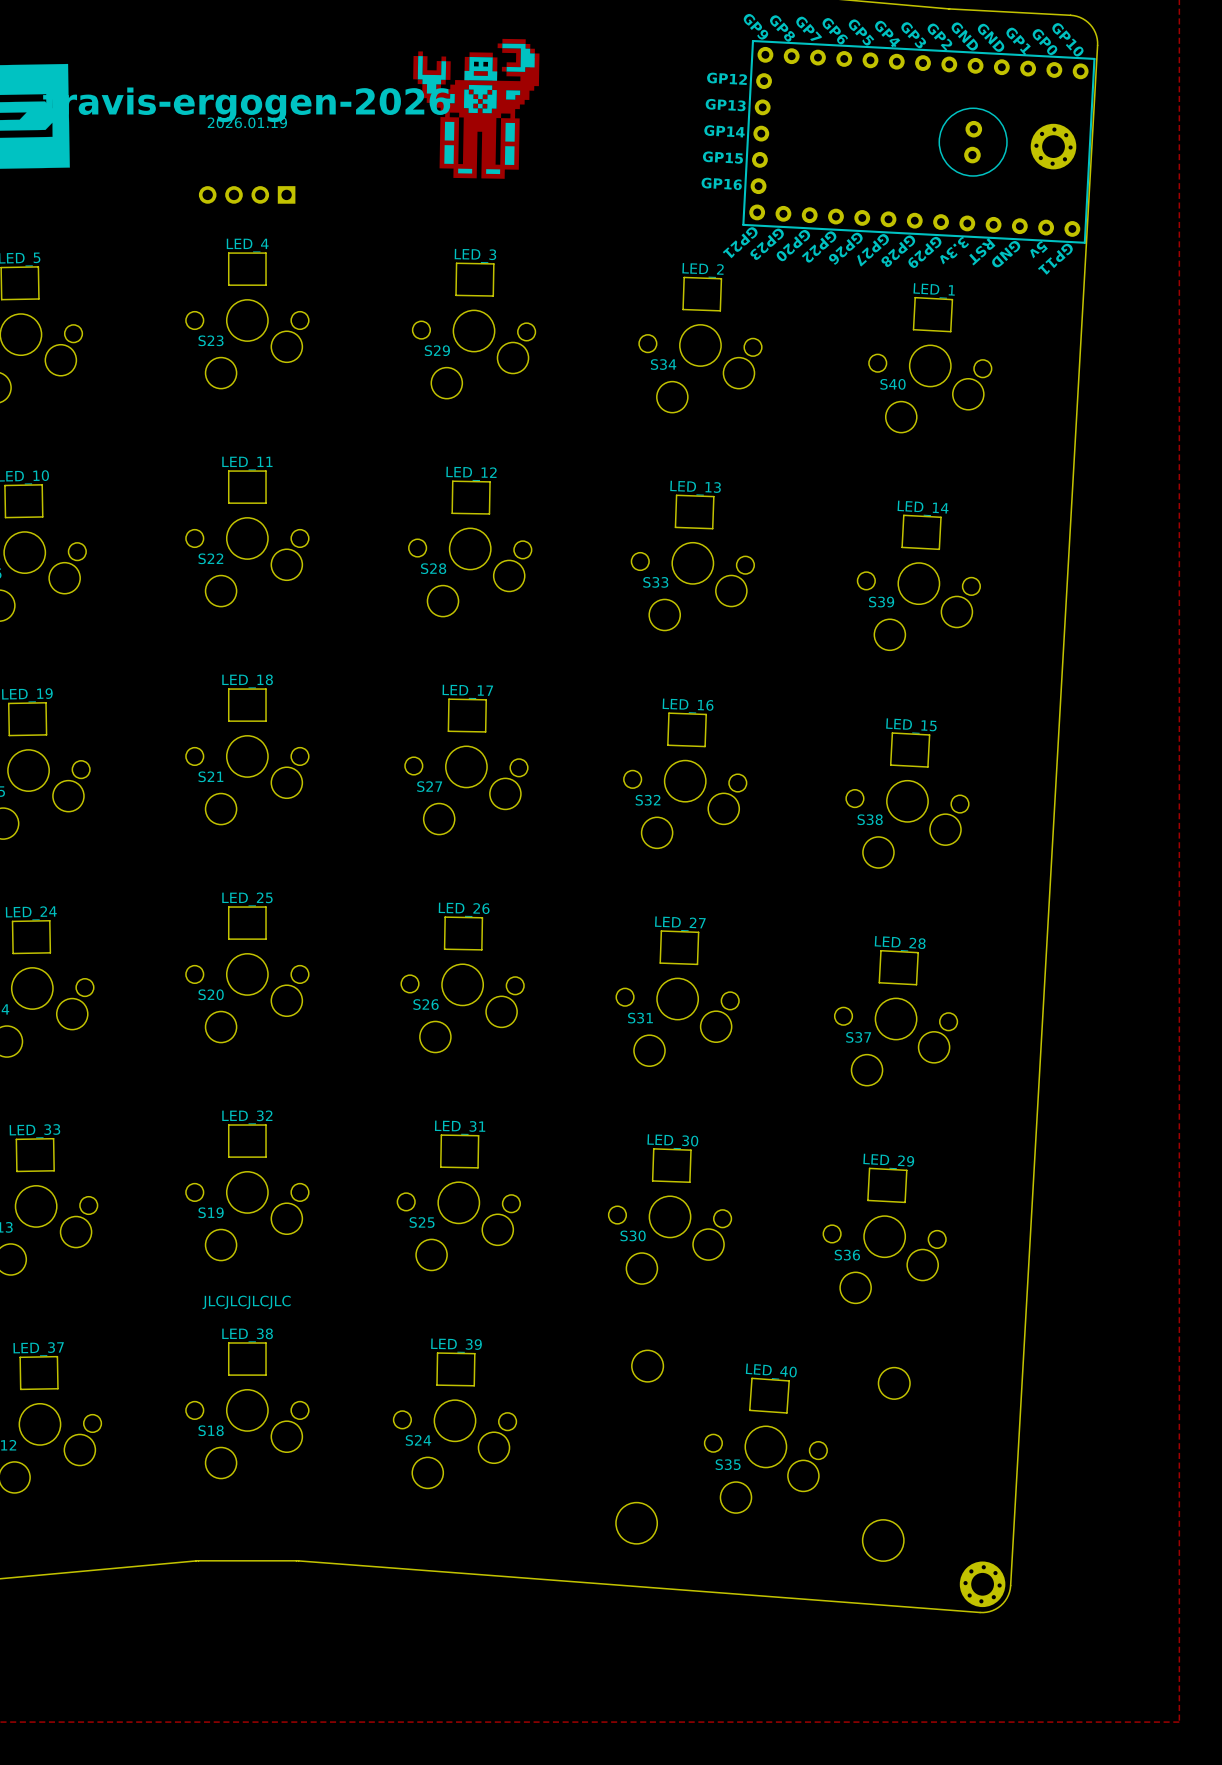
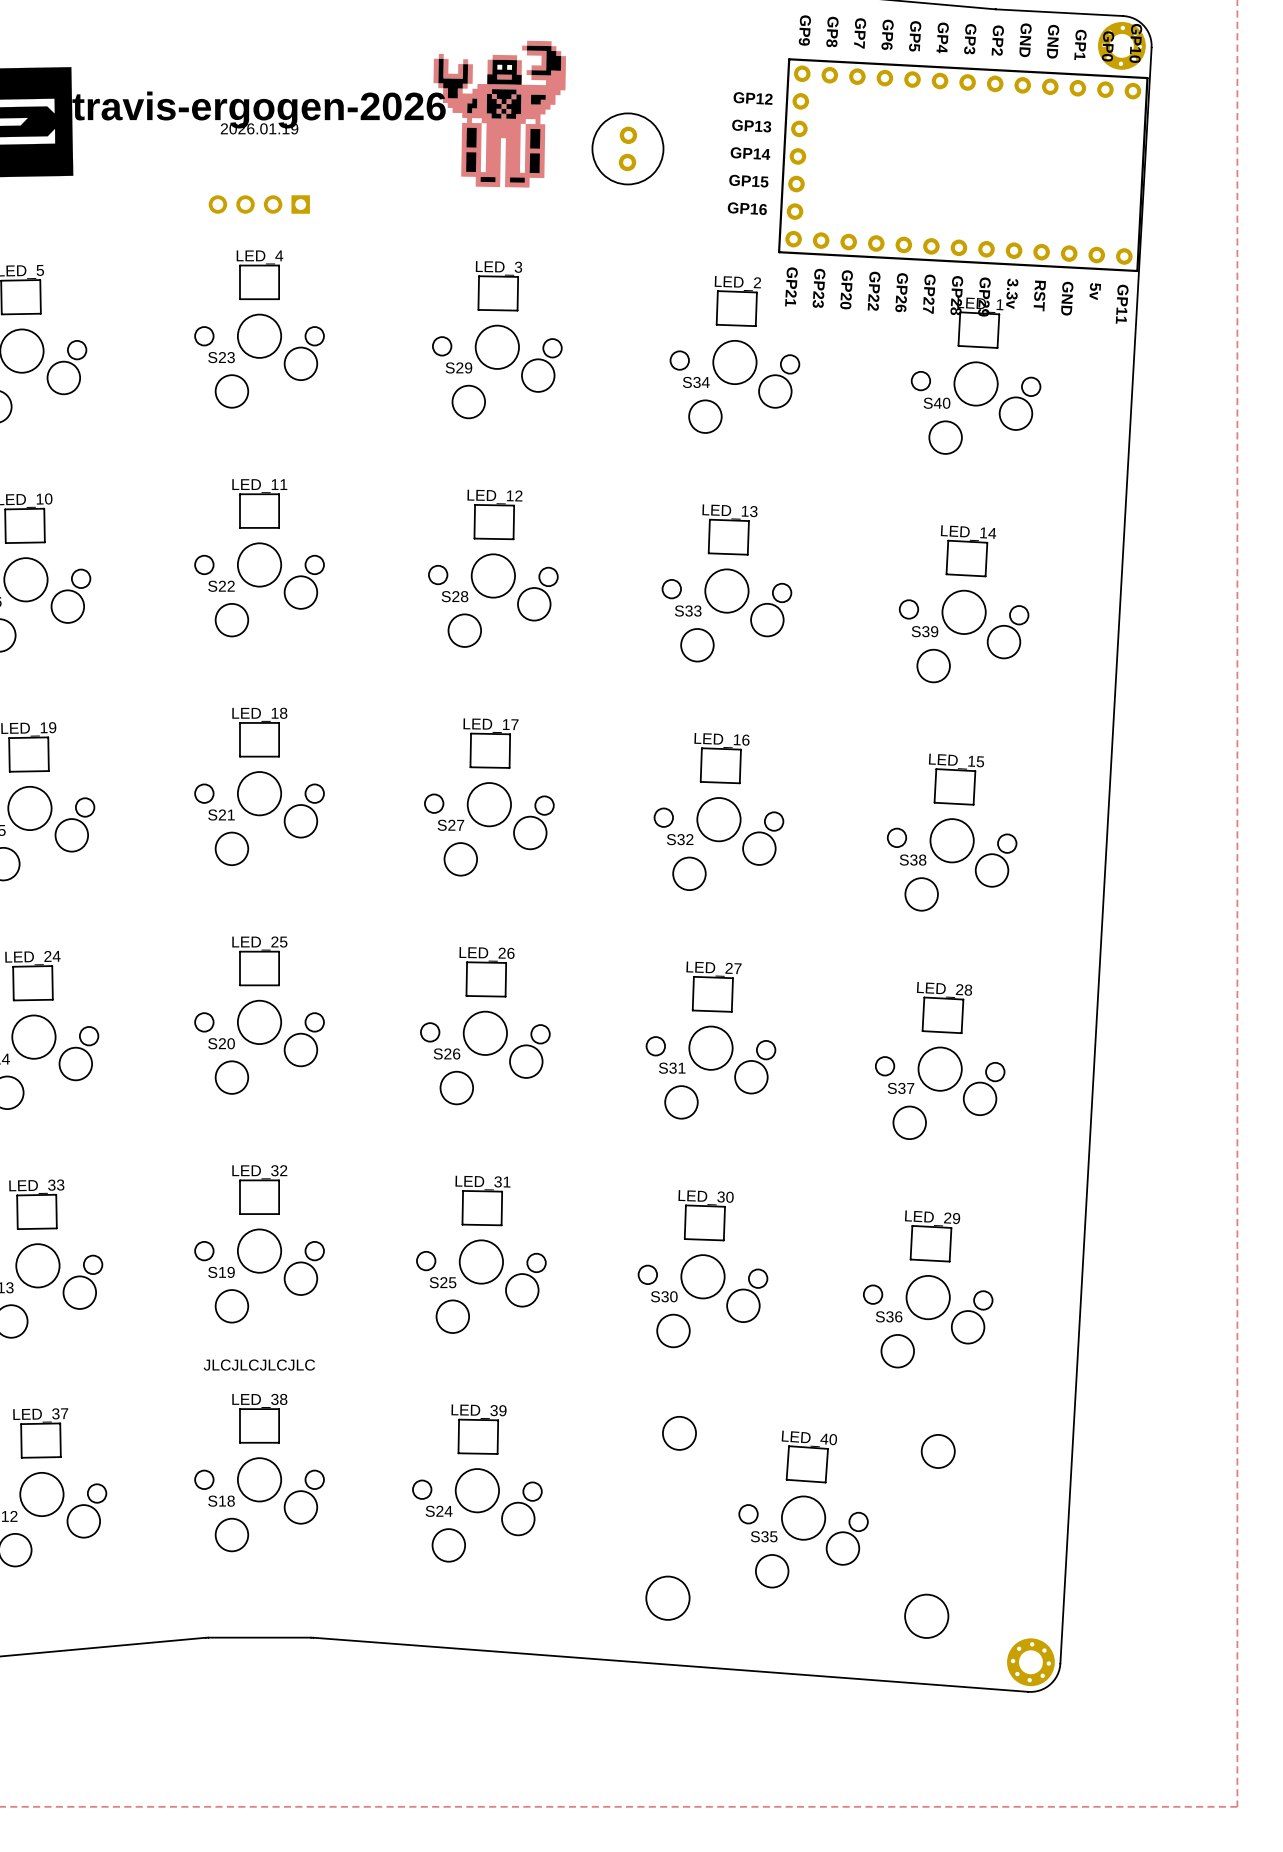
part: none -> (627, 148)
part: (918, 141) -> none
part: (973, 142) -> none
part position: (1053, 146) -> (1121, 45)
part: none -> (963, 165)

